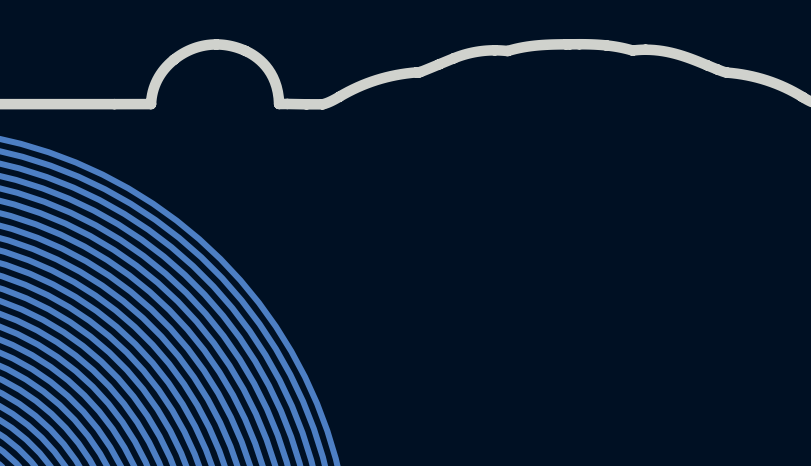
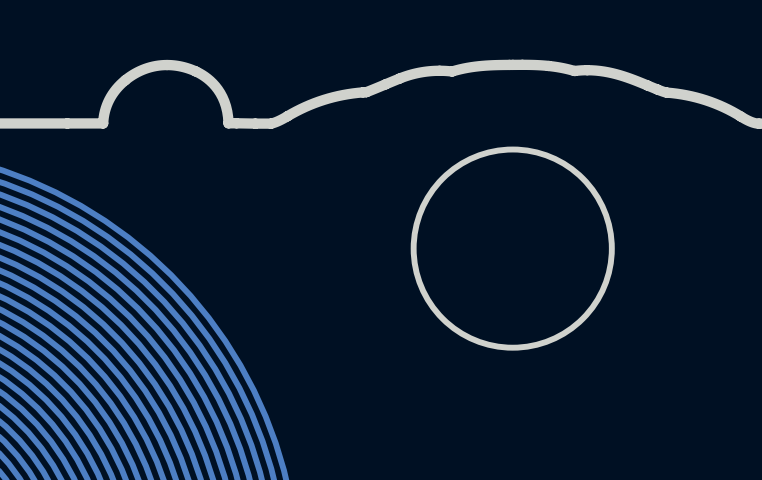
round board edge: none -> [410, 146, 615, 351]

